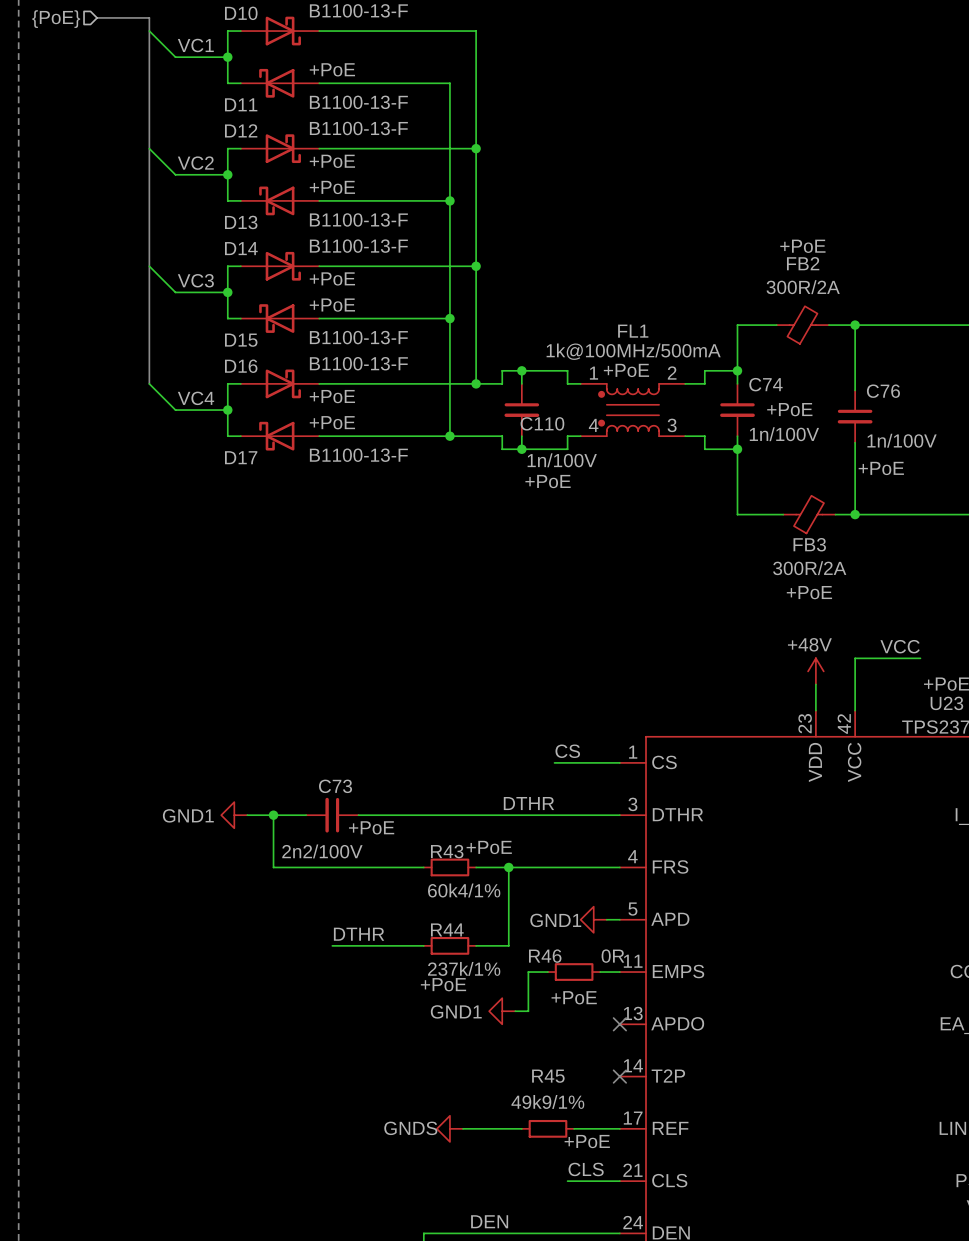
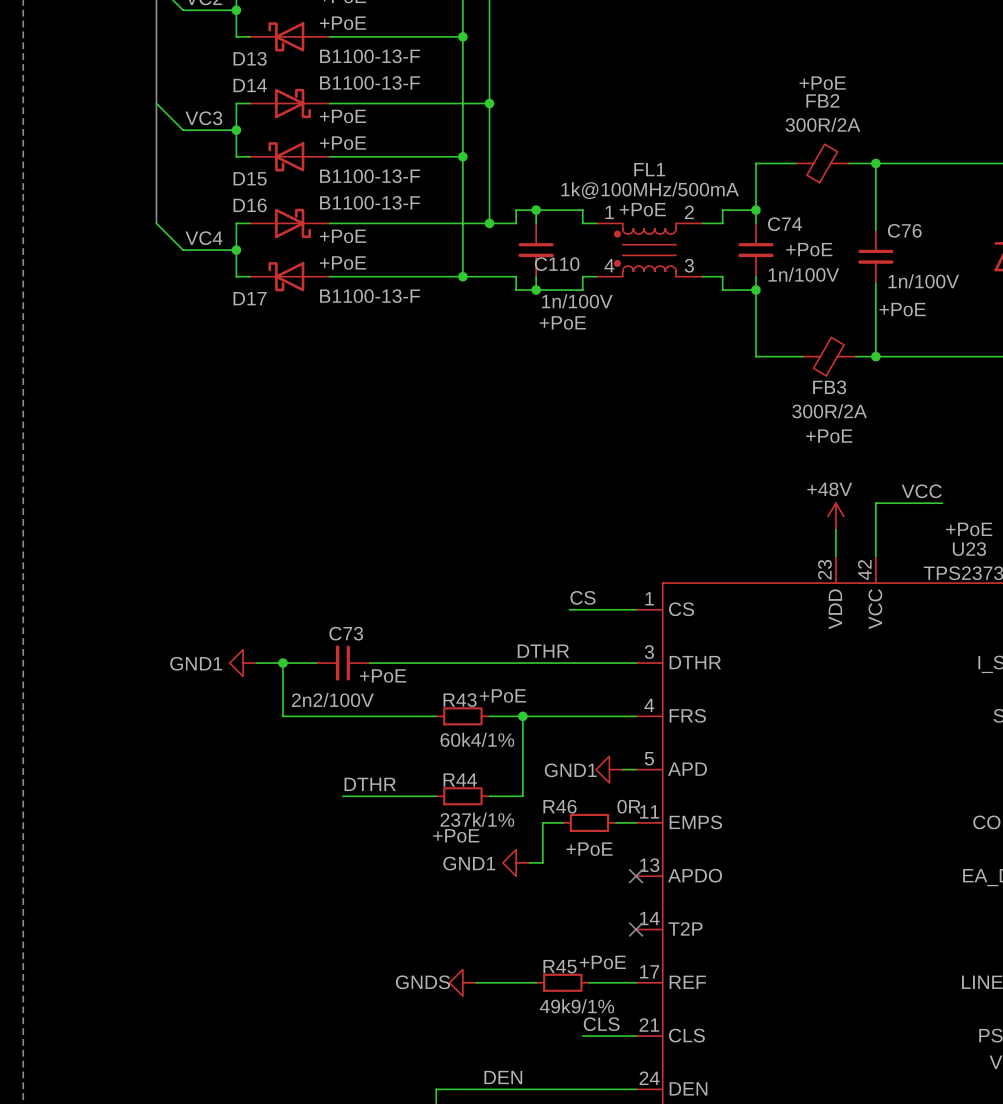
R45 name position: R45 (548, 1076) -> R45 (560, 966)
R45 value position: 49k9/1% (547, 1101) -> 49k9/1% (577, 1006)
R45 text position: +PoE (587, 1141) -> +PoE (602, 962)

